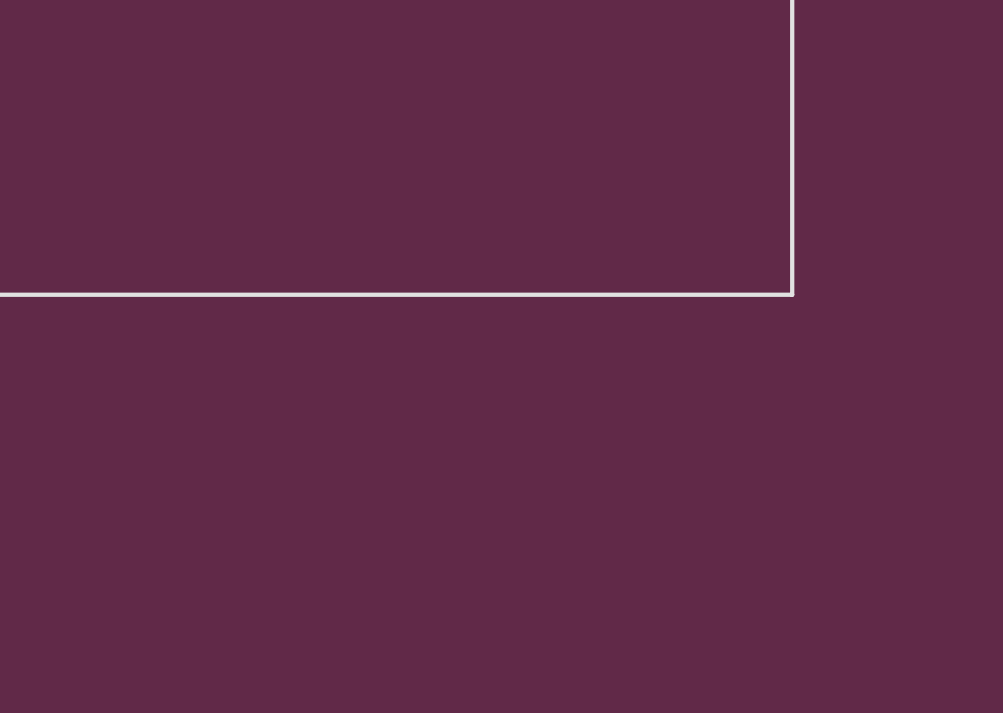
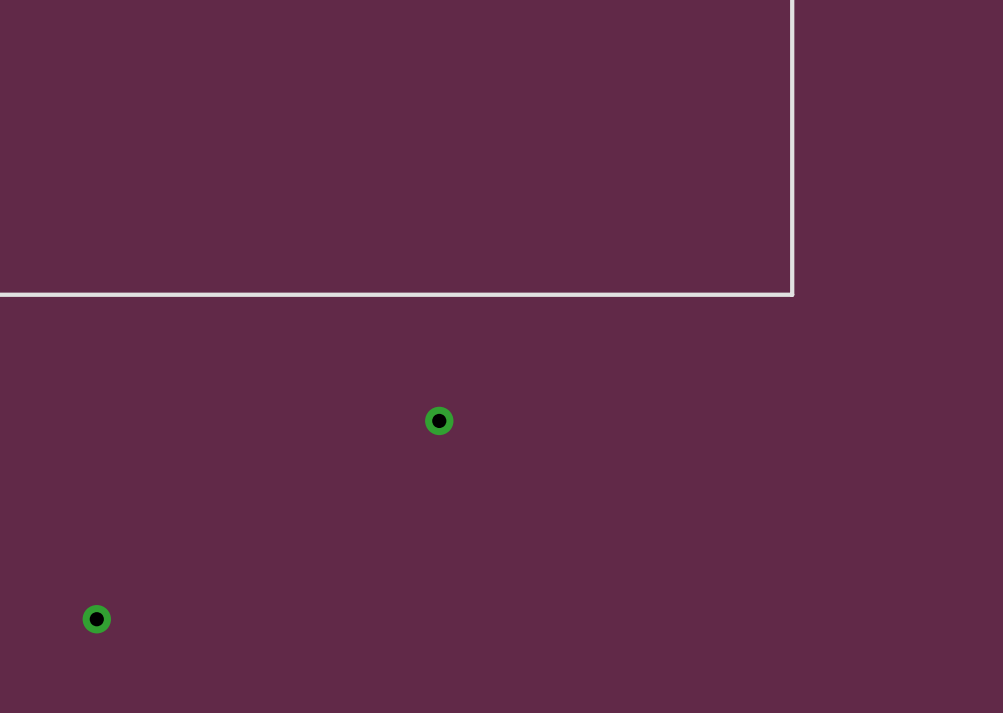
via: none -> (439, 420)
via: none -> (96, 619)

